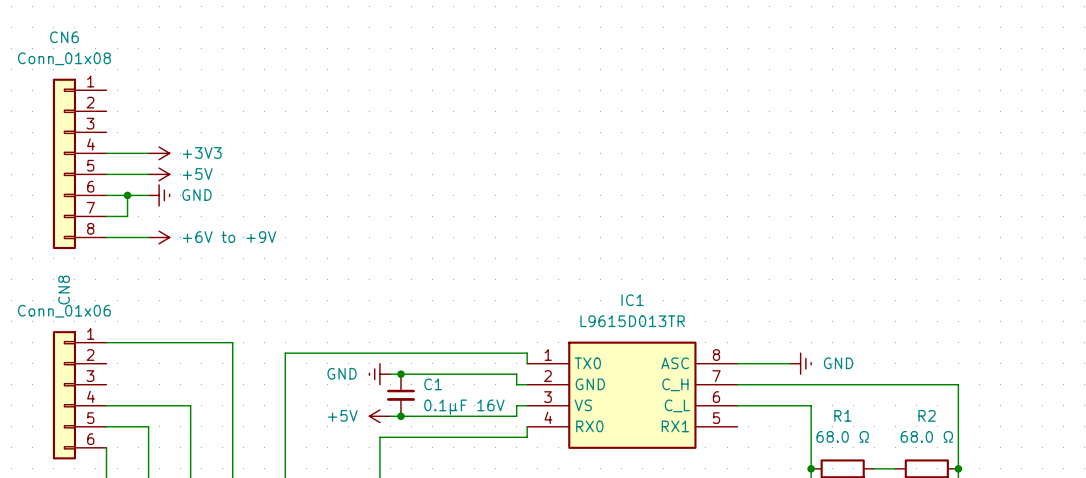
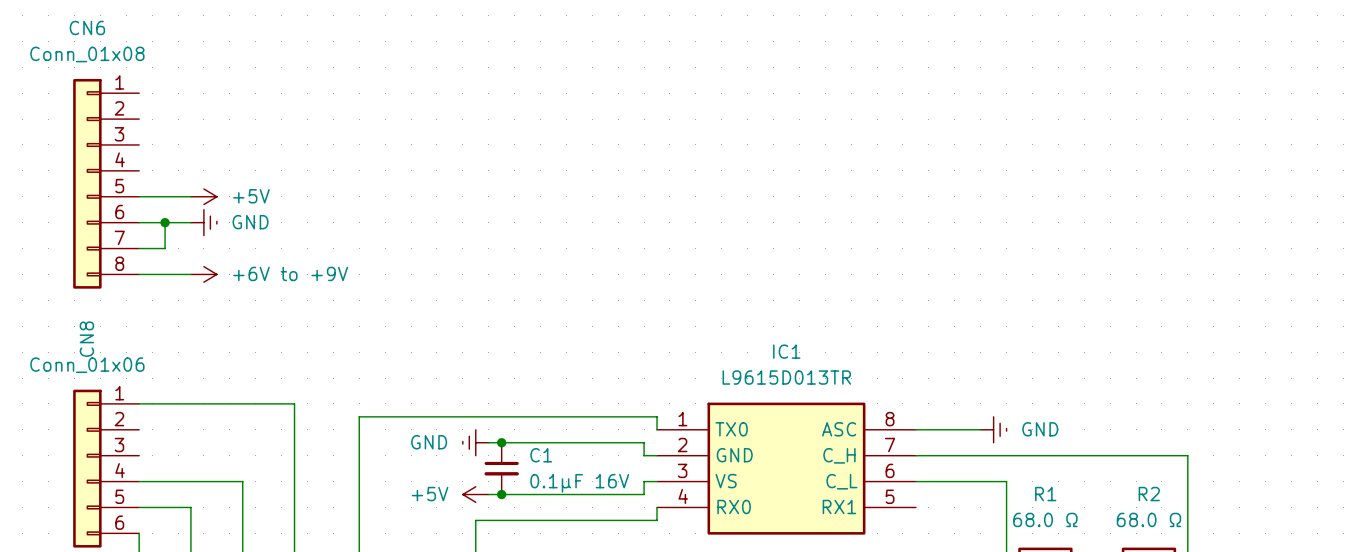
wire: (106, 153) (148, 153) -> none
power symbol: +3V3 (159, 153) -> none

